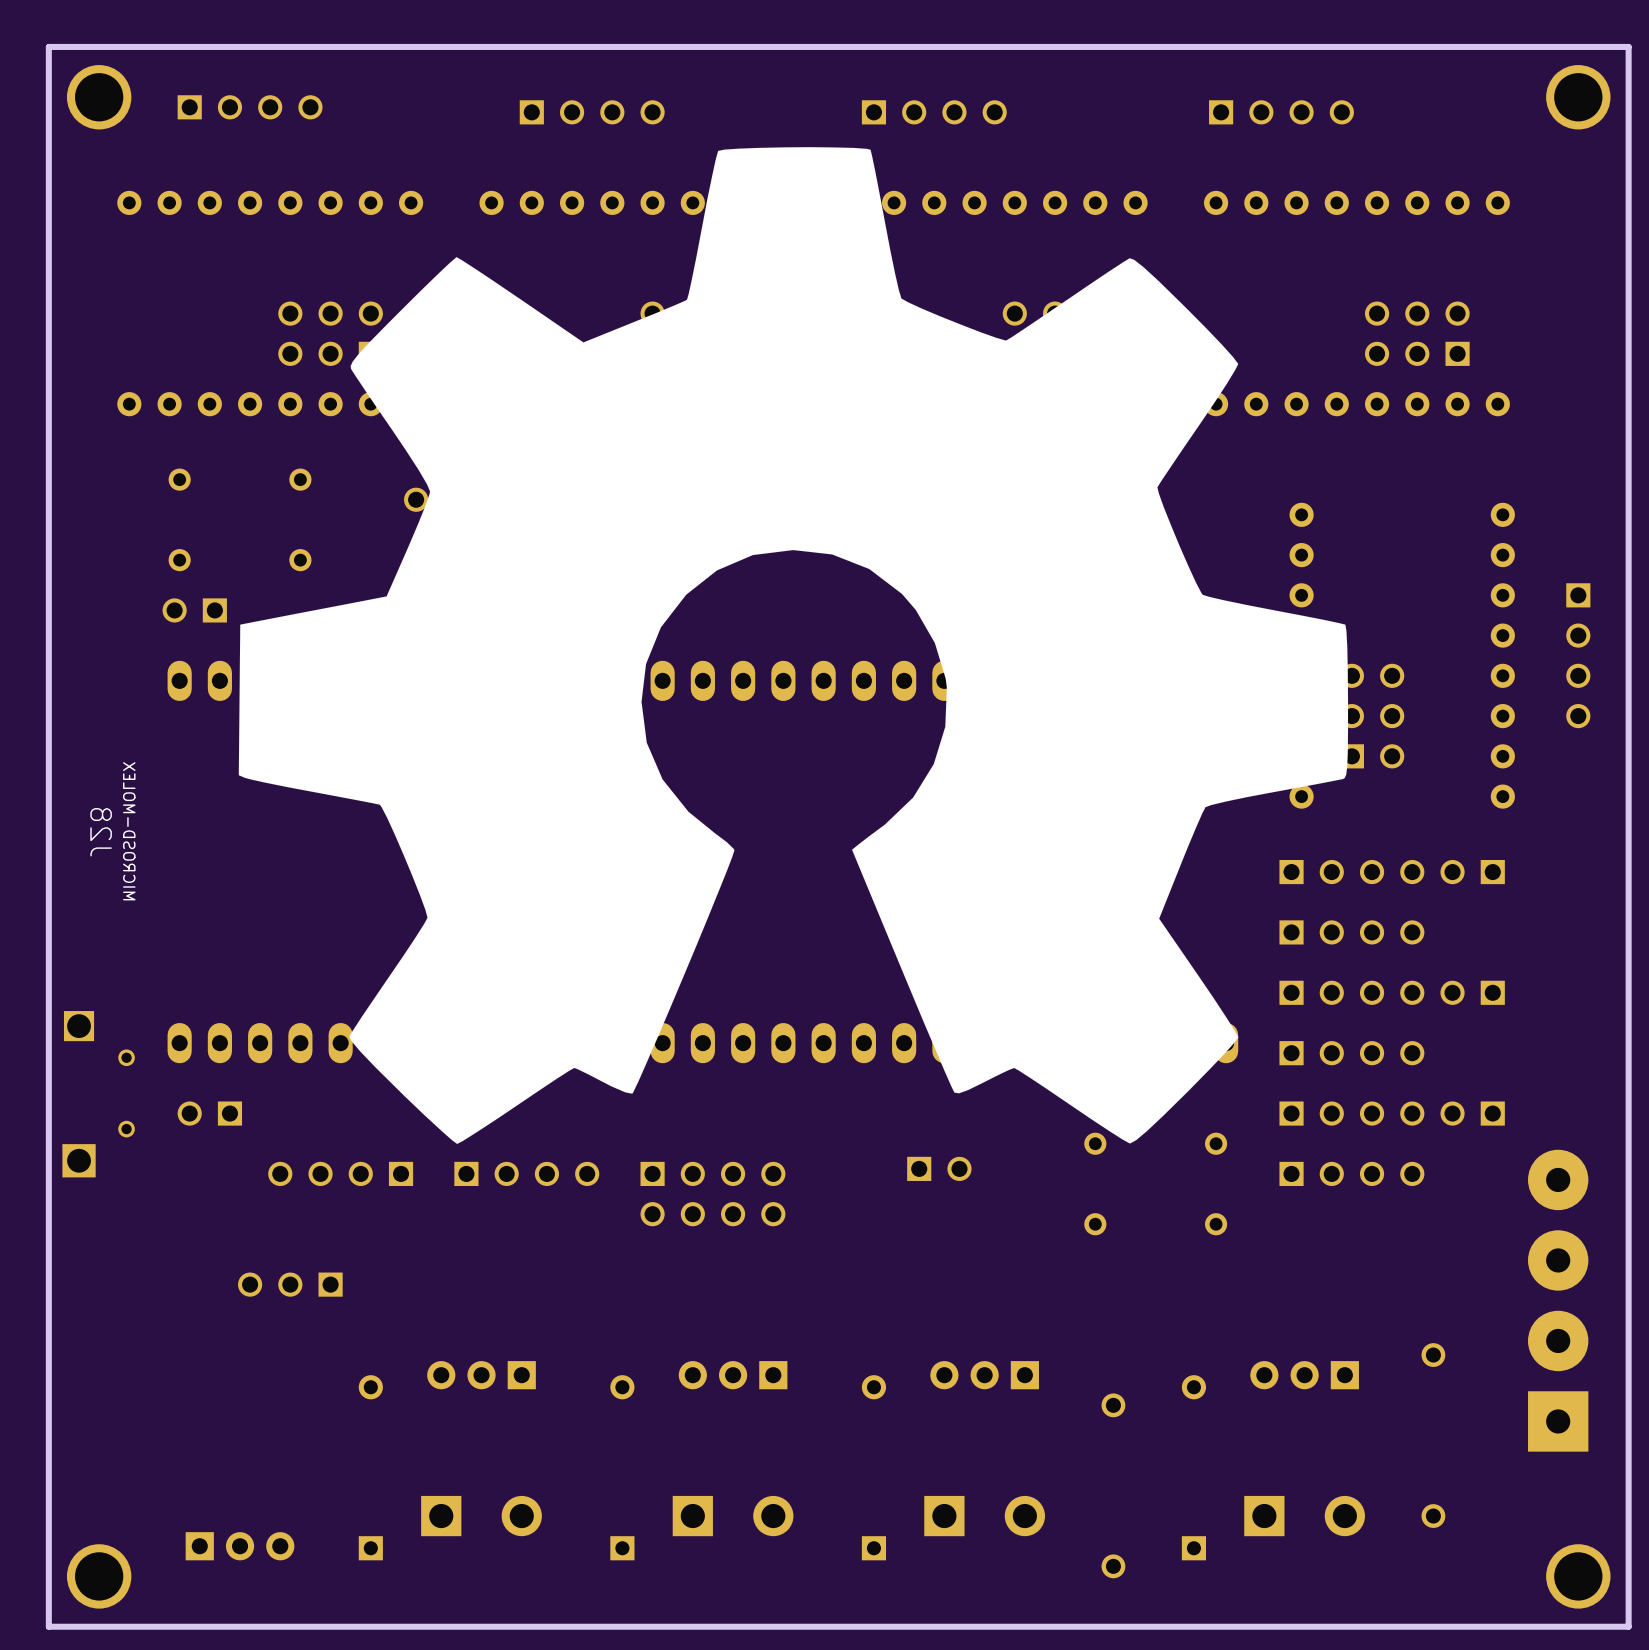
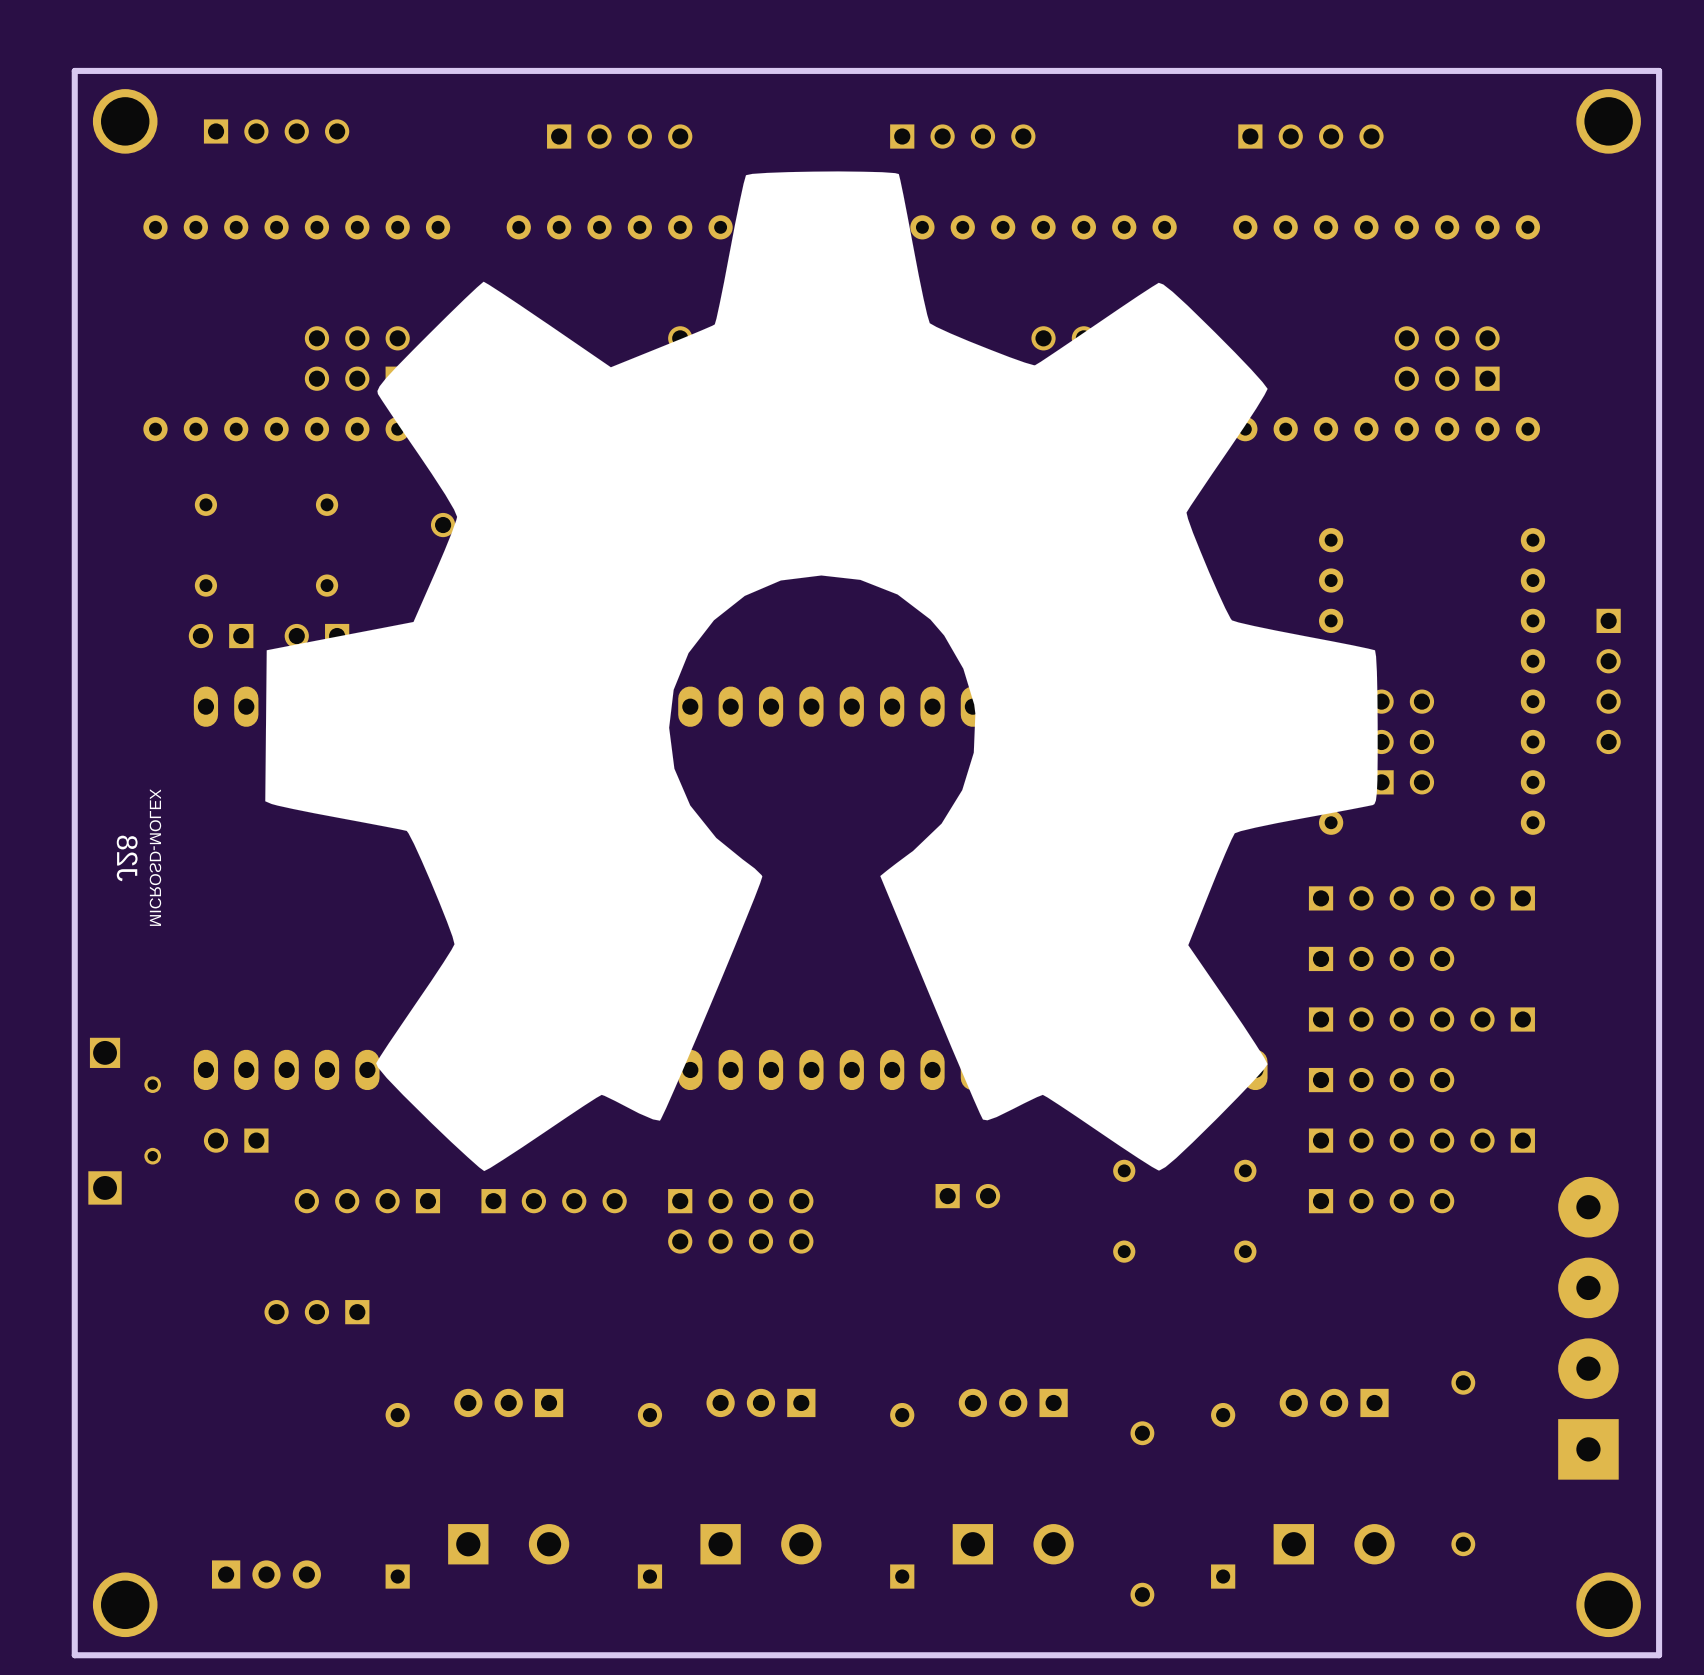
part: none -> (316, 636)

